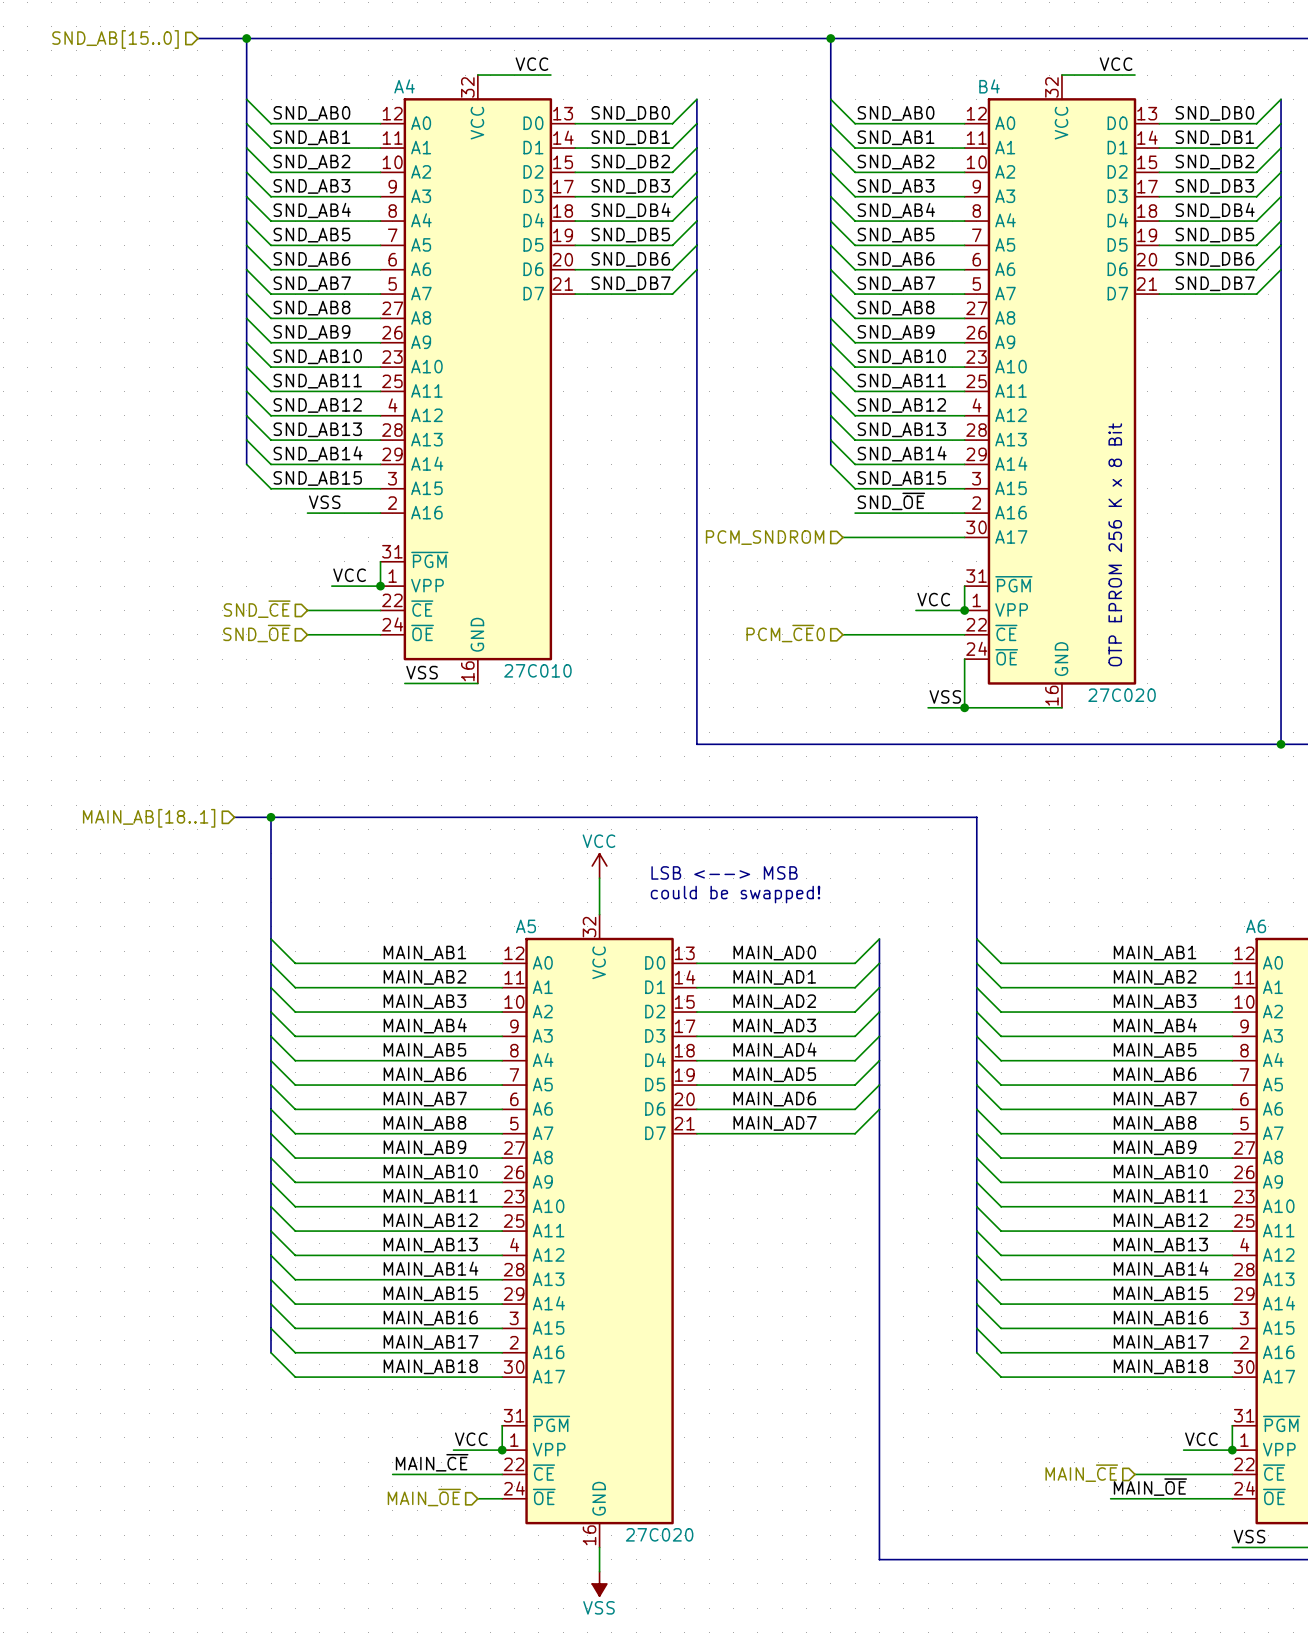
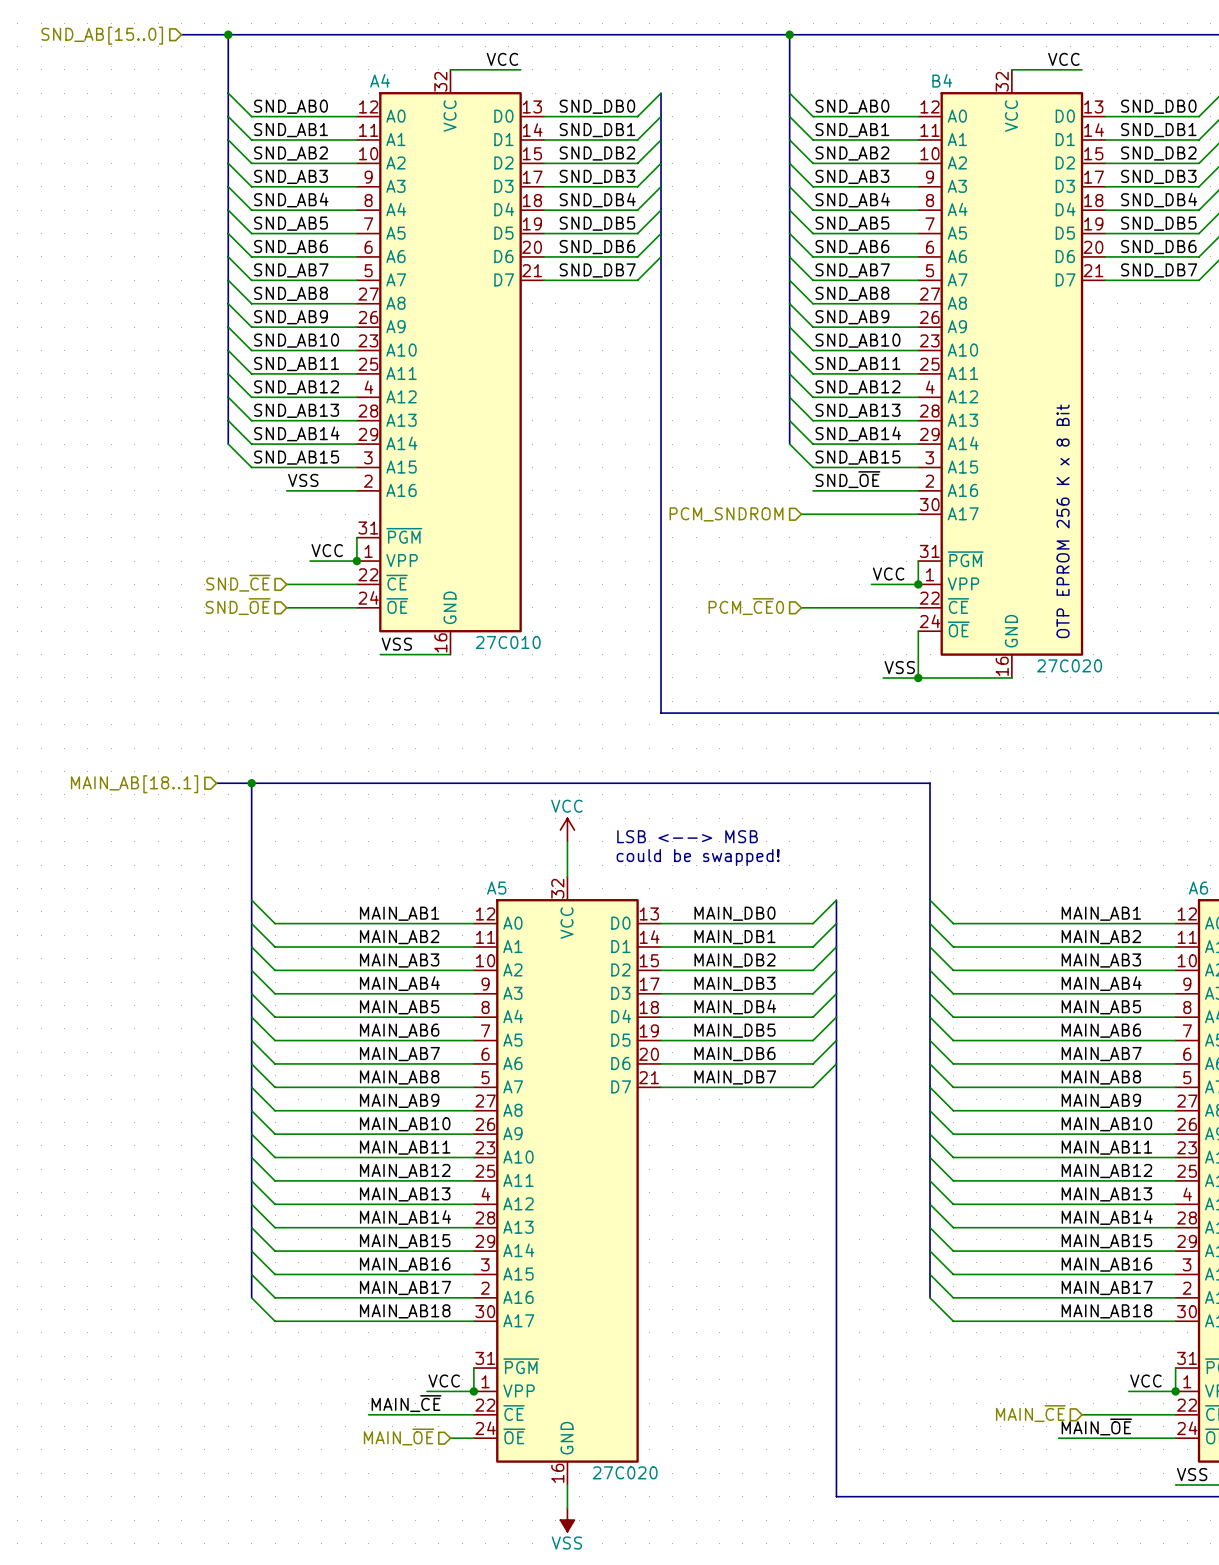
label: MAIN_AD0 (774, 953) -> MAIN_DB0 (734, 913)
label: MAIN_AD1 (774, 977) -> MAIN_DB1 (734, 937)
label: MAIN_AD2 (774, 1001) -> MAIN_DB2 (734, 960)
label: MAIN_AD3 (774, 1026) -> MAIN_DB3 (734, 983)
label: MAIN_AD4 (775, 1050) -> MAIN_DB4 (735, 1007)
label: MAIN_AD5 (774, 1074) -> MAIN_DB5 (734, 1030)
label: MAIN_AD6 (774, 1099) -> MAIN_DB6 (734, 1054)
label: MAIN_AD7 (775, 1123) -> MAIN_DB7 (735, 1077)

